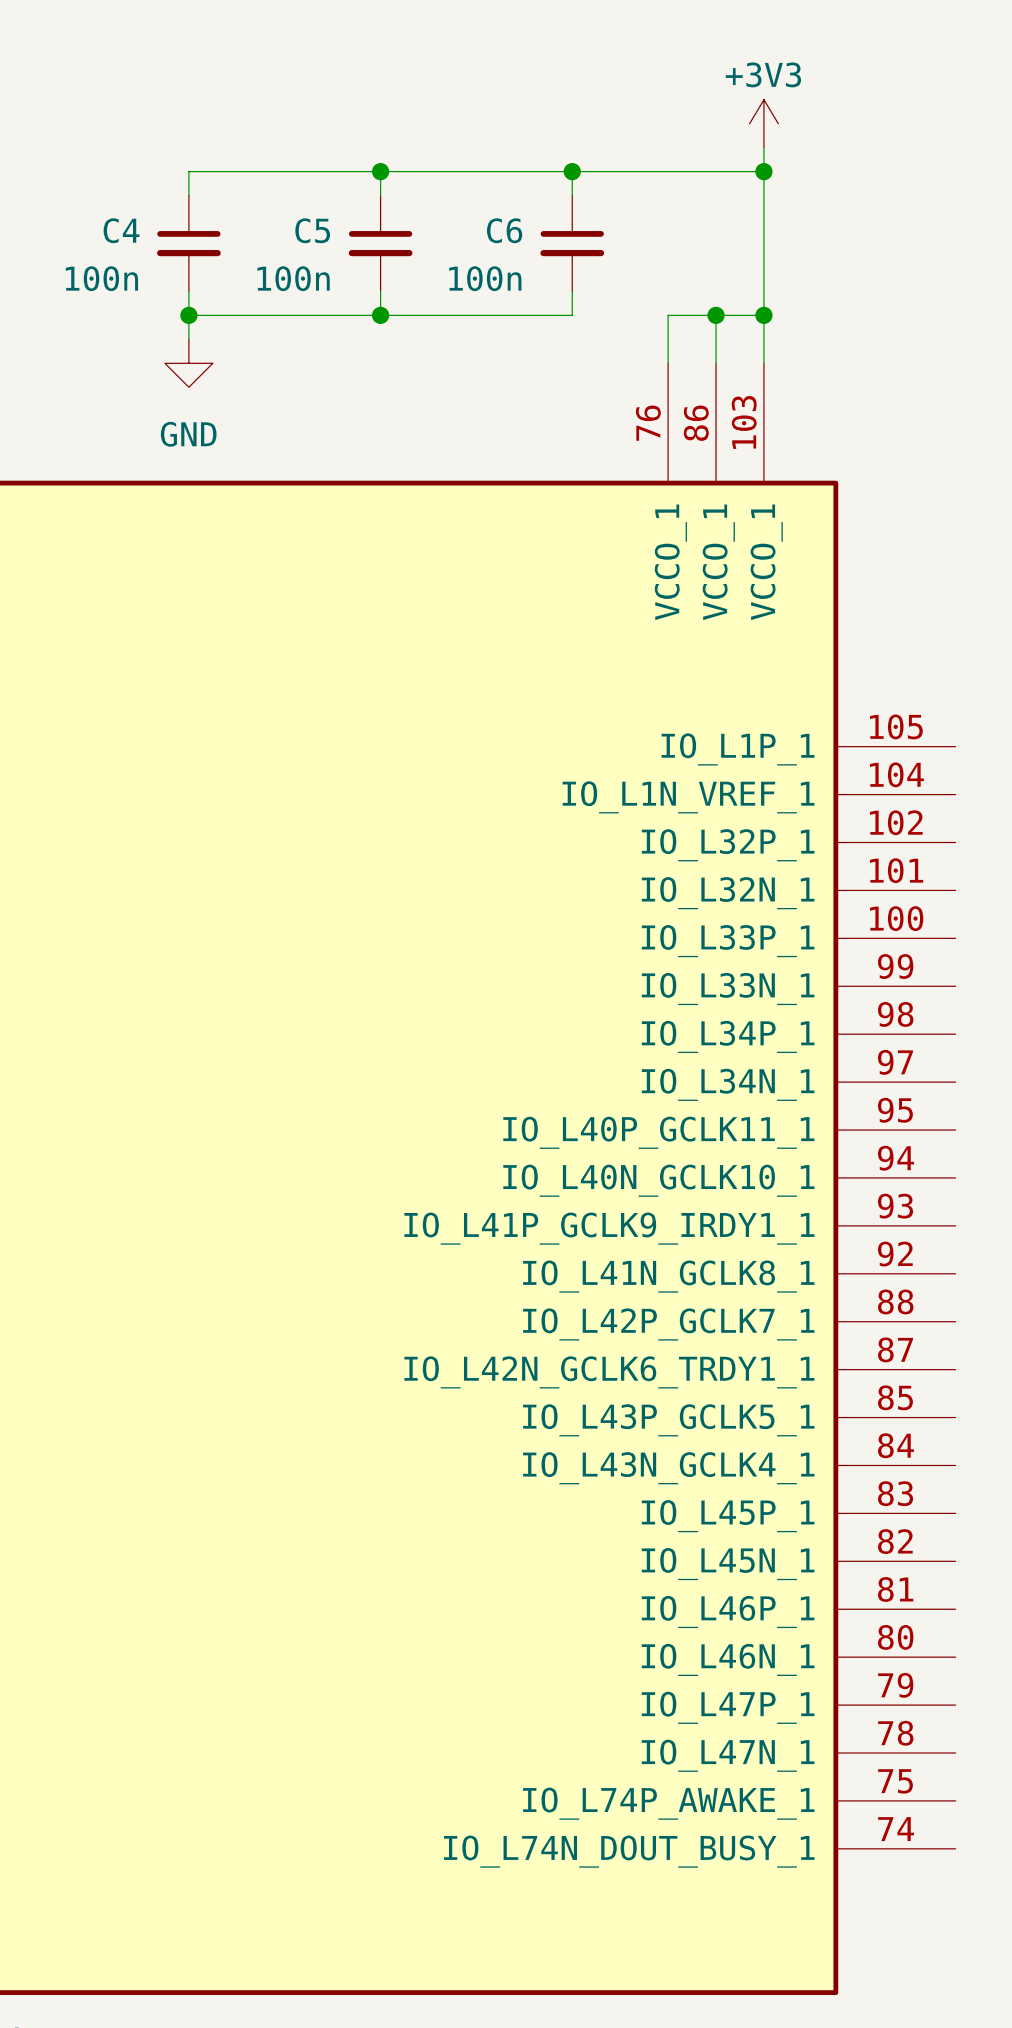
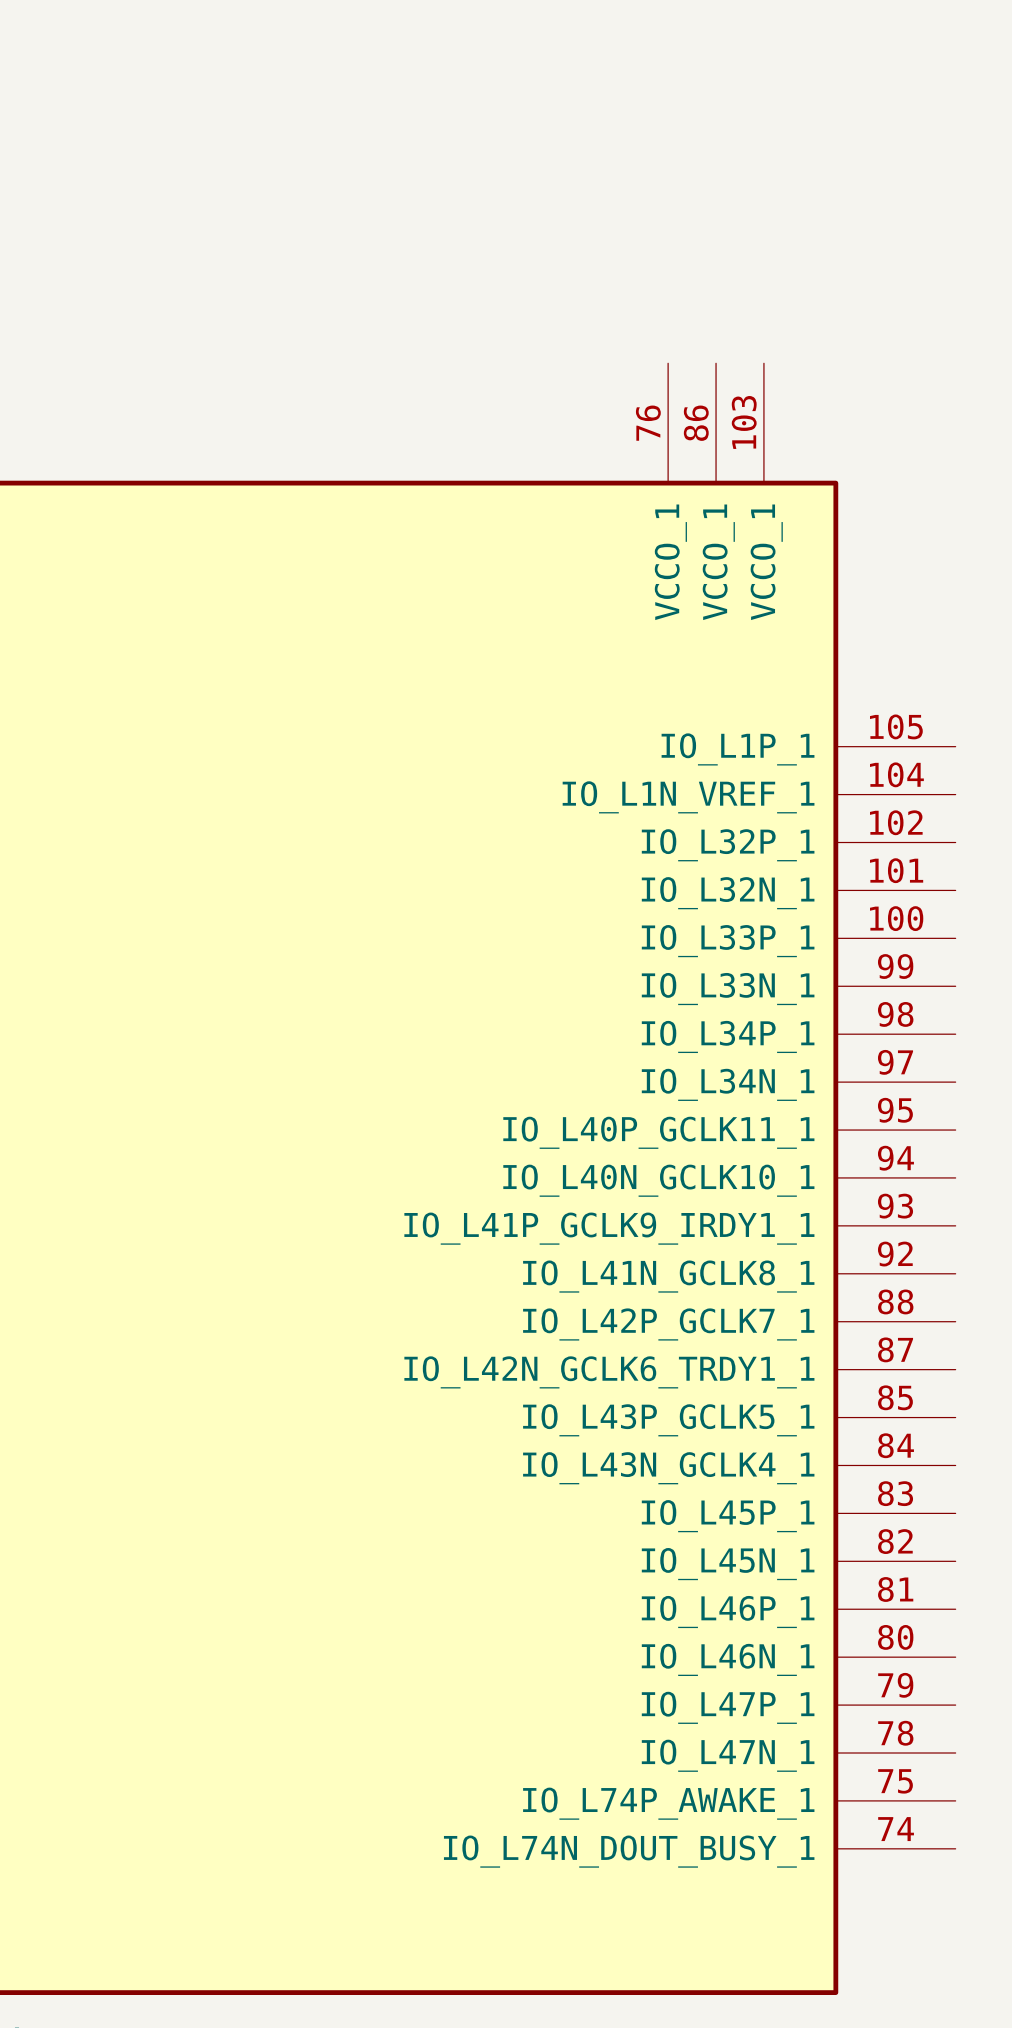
power symbol: +3V3 (763, 123) -> none
wire: (763, 147) (763, 363) -> none
wire: (380, 171) (380, 195) -> none
junction: (380, 171) -> none
wire: (572, 171) (572, 195) -> none
junction: (572, 171) -> none
wire: (763, 171) (188, 171) (188, 195) -> none
junction: (763, 171) -> none
C4: 100n (188, 243) -> none
C5: 100n (380, 243) -> none
C6: 100n (572, 243) -> none
wire: (188, 291) (188, 339) -> none
wire: (380, 291) (380, 315) -> none
wire: (572, 291) (572, 315) (188, 315) -> none
junction: (188, 315) -> none
junction: (380, 315) -> none
wire: (716, 315) (716, 363) -> none
junction: (716, 315) -> none
wire: (763, 315) (668, 315) (668, 363) -> none
junction: (763, 315) -> none
power symbol: GND (188, 363) -> none

